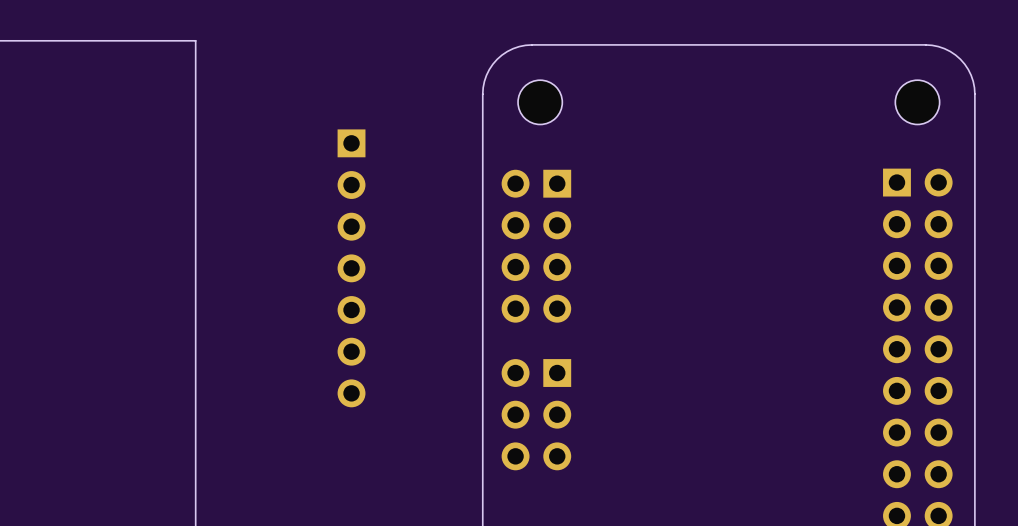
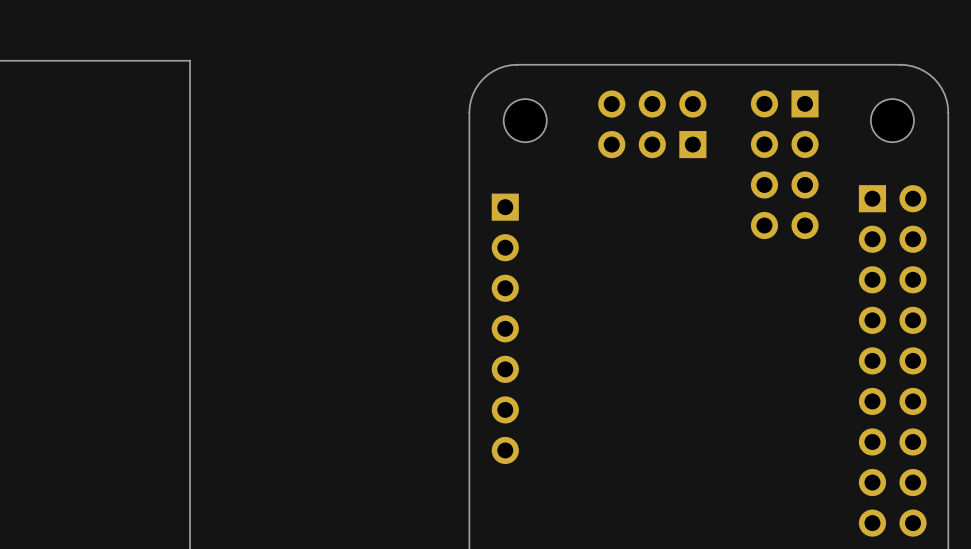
part position: (536, 246) -> (784, 164)
part position: (351, 268) -> (505, 328)
part rotation: 0° (536, 414) -> 90° clockwise (652, 124)
part position: (536, 414) -> (652, 124)

